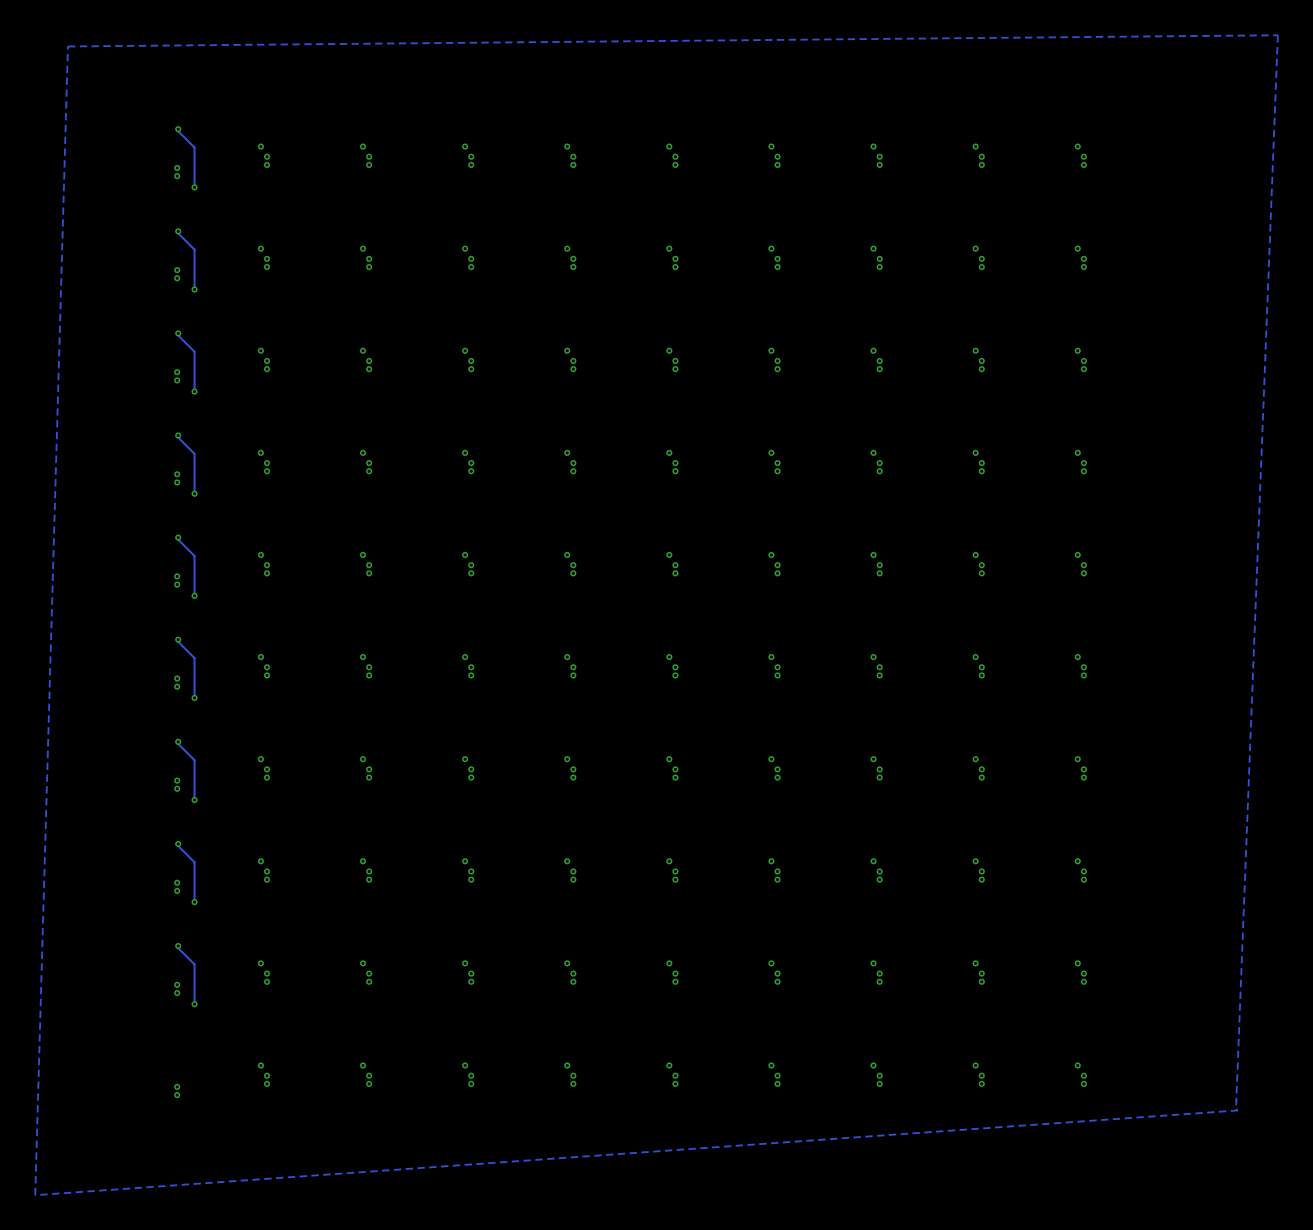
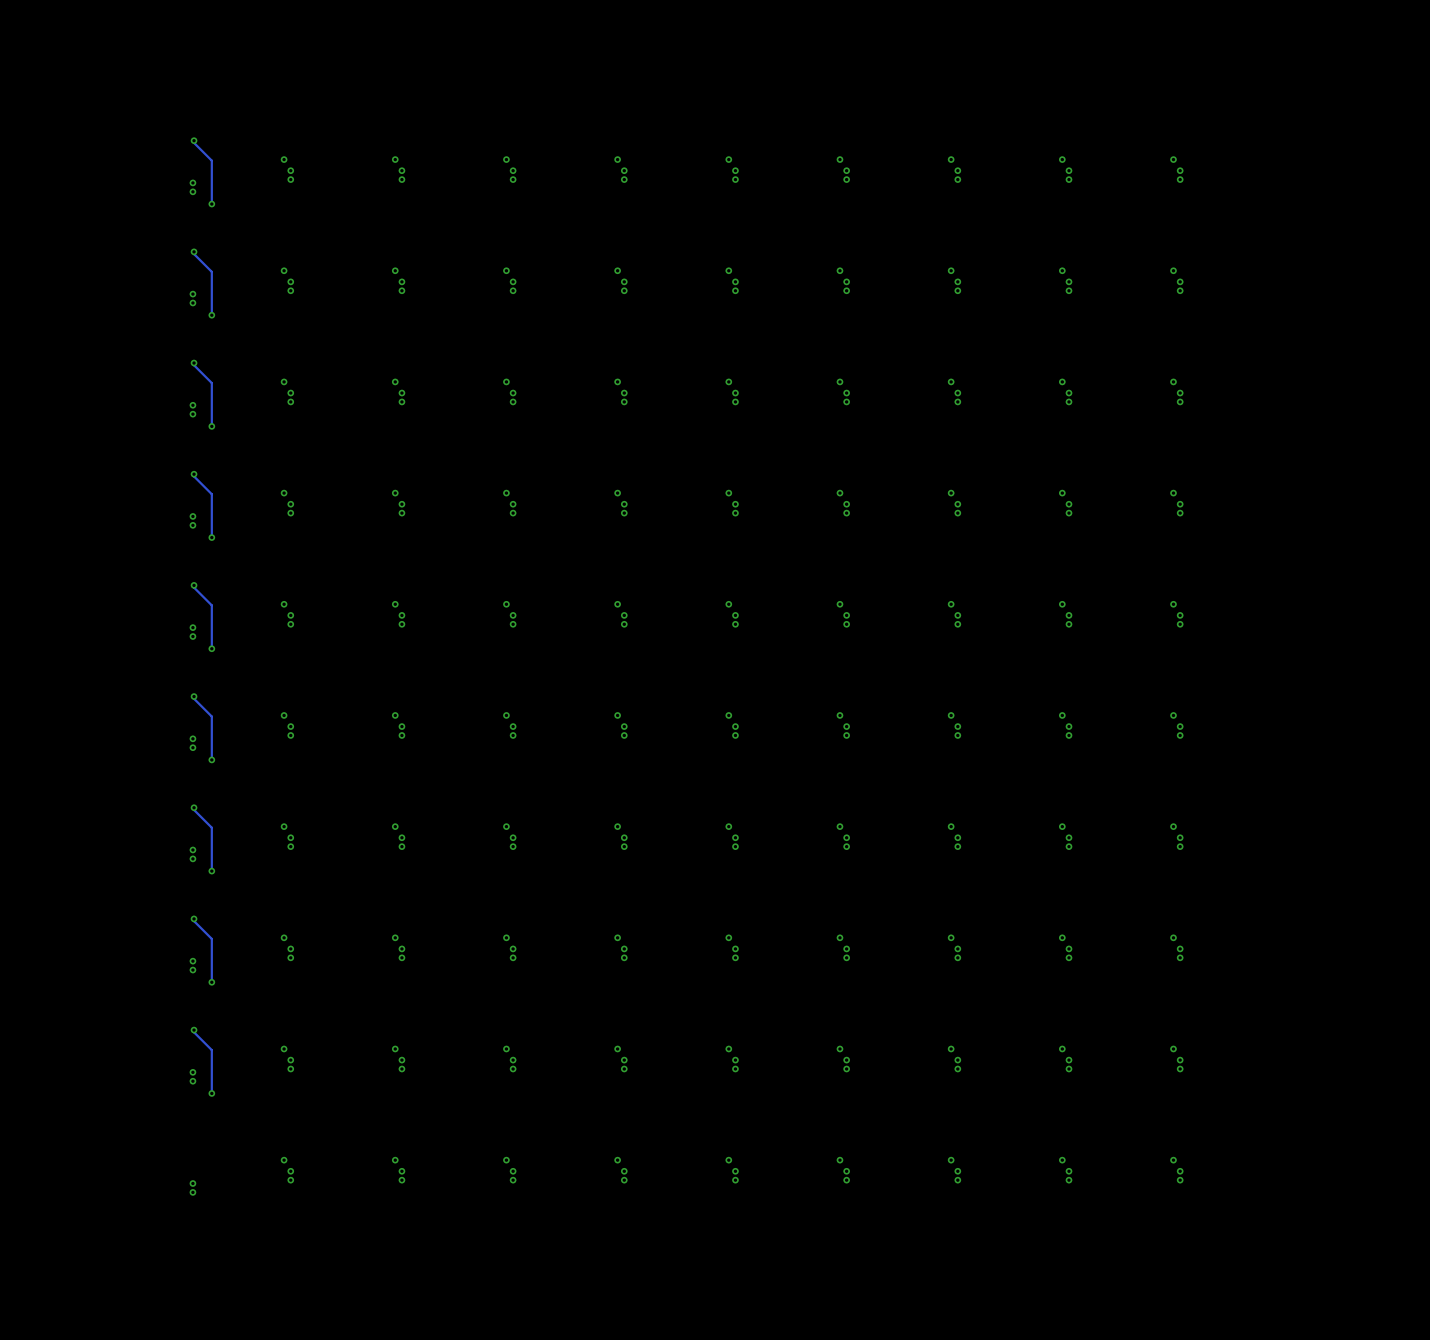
zone outline: (1277, 35) (67, 46) (35, 1195) (1238, 1110) (1236, 1109) (1277, 35) -> none

